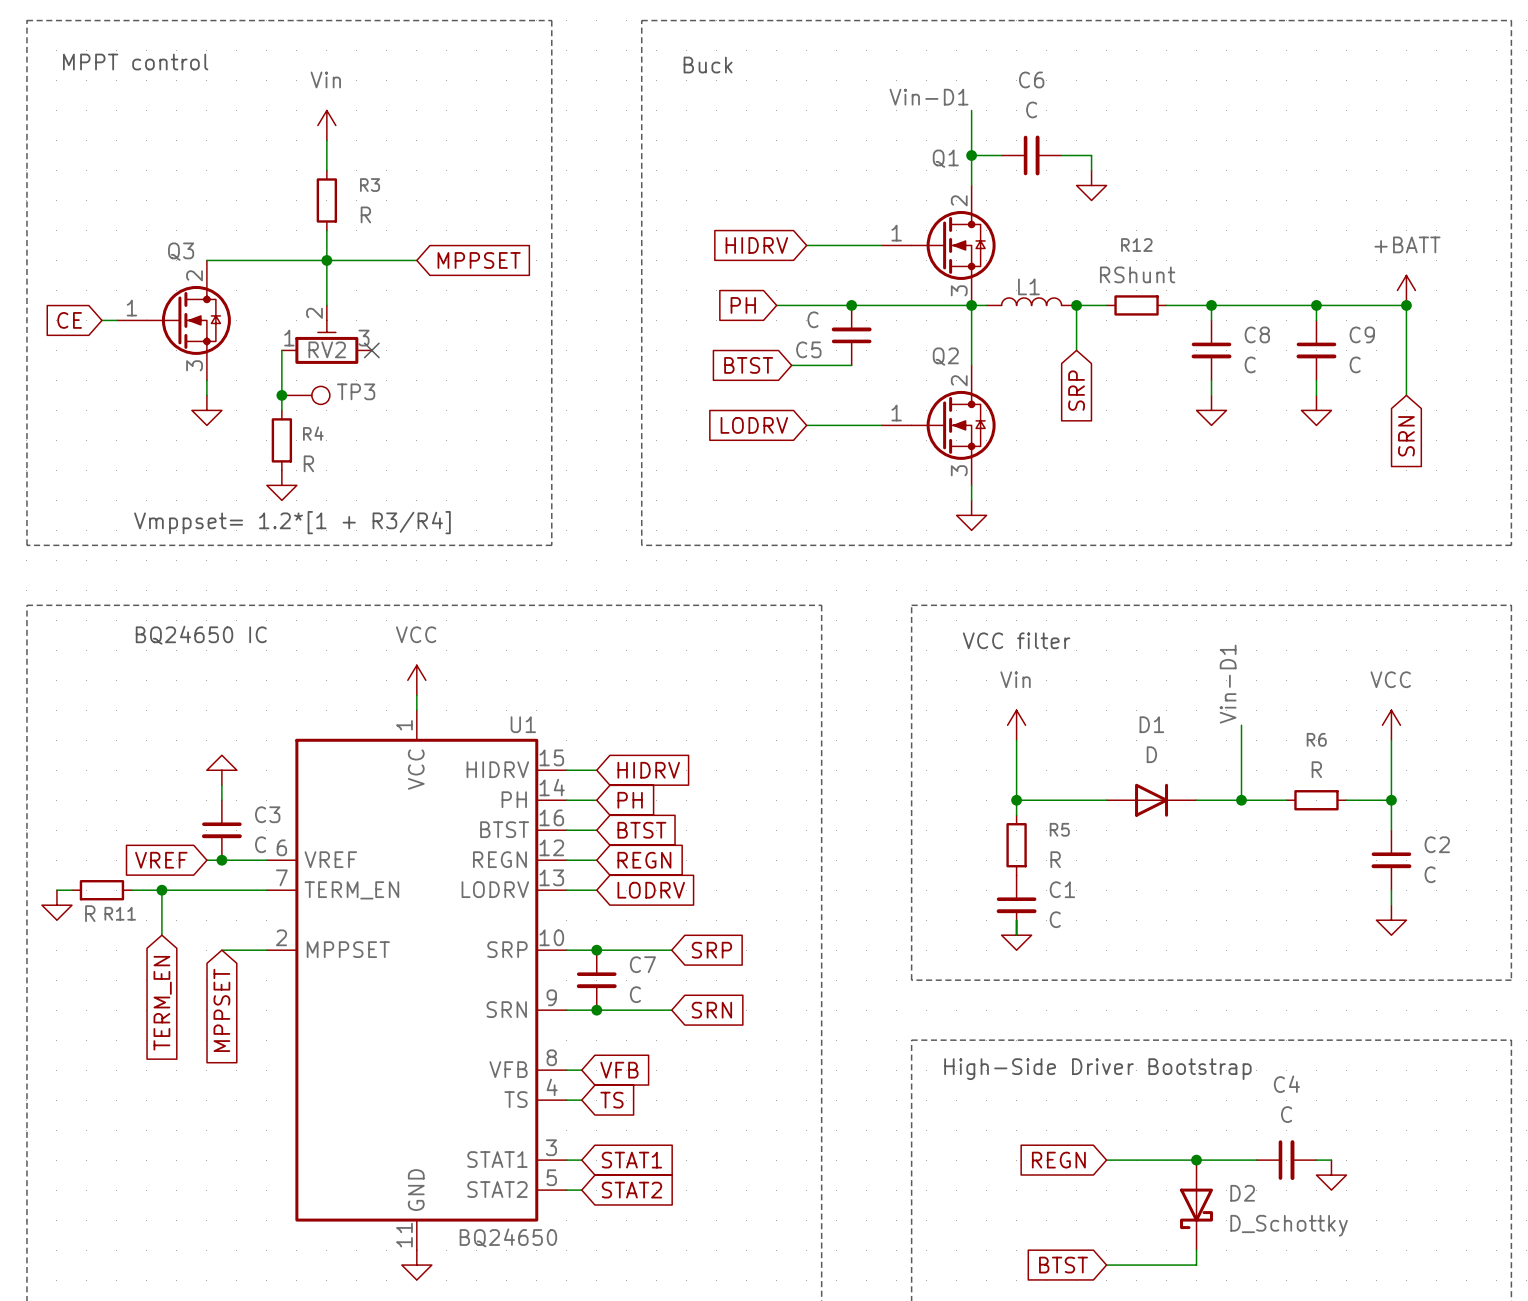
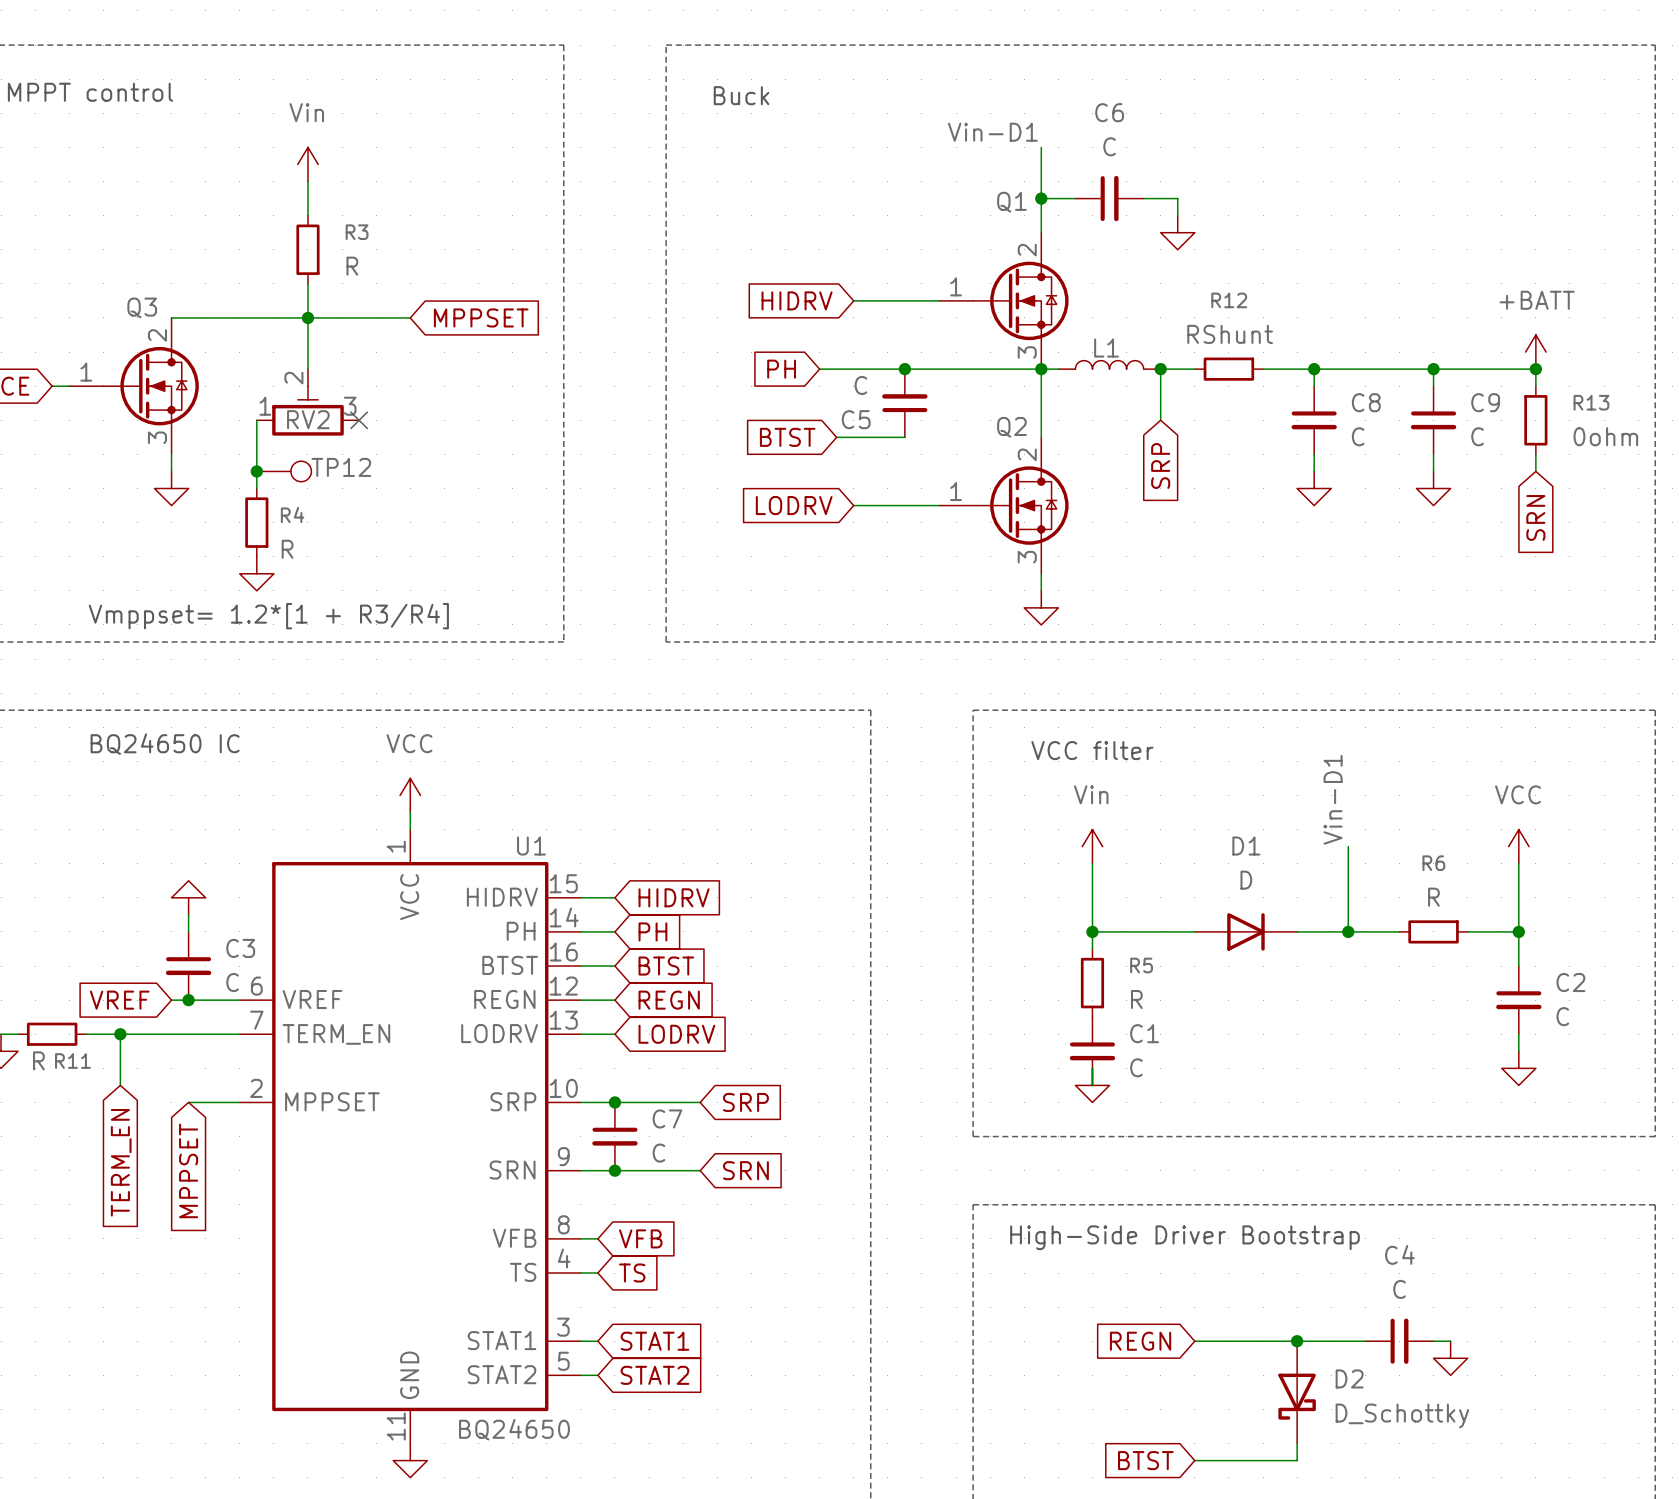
wire: (1406, 320) (1406, 380) -> none
R13: none -> 0ohm (1535, 420)
TP3 name: TP3 (356, 391) -> TP12 (341, 467)

